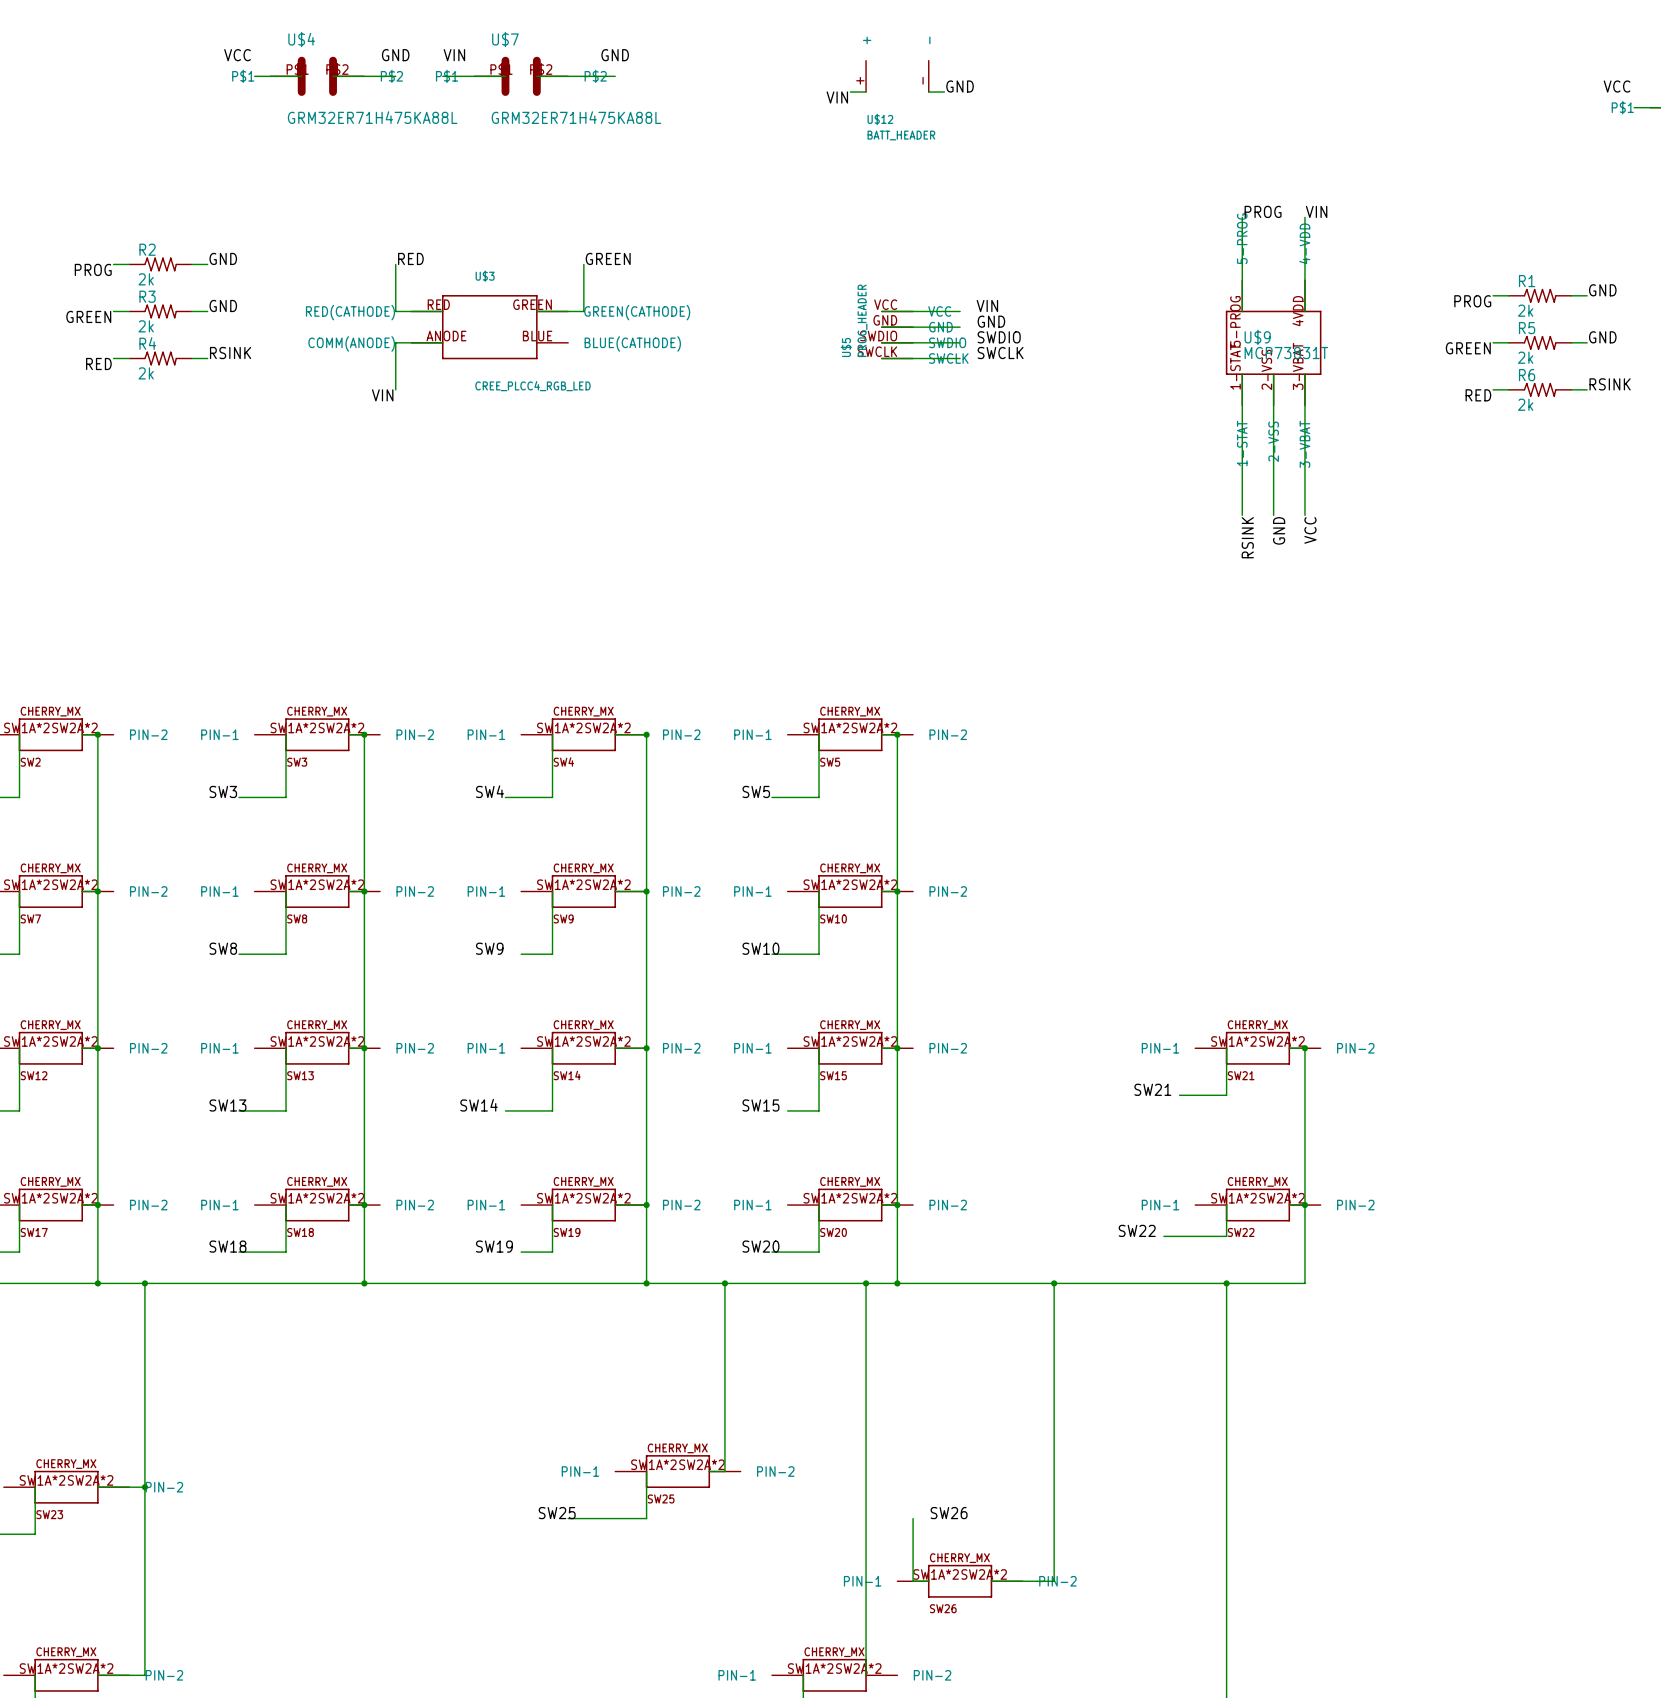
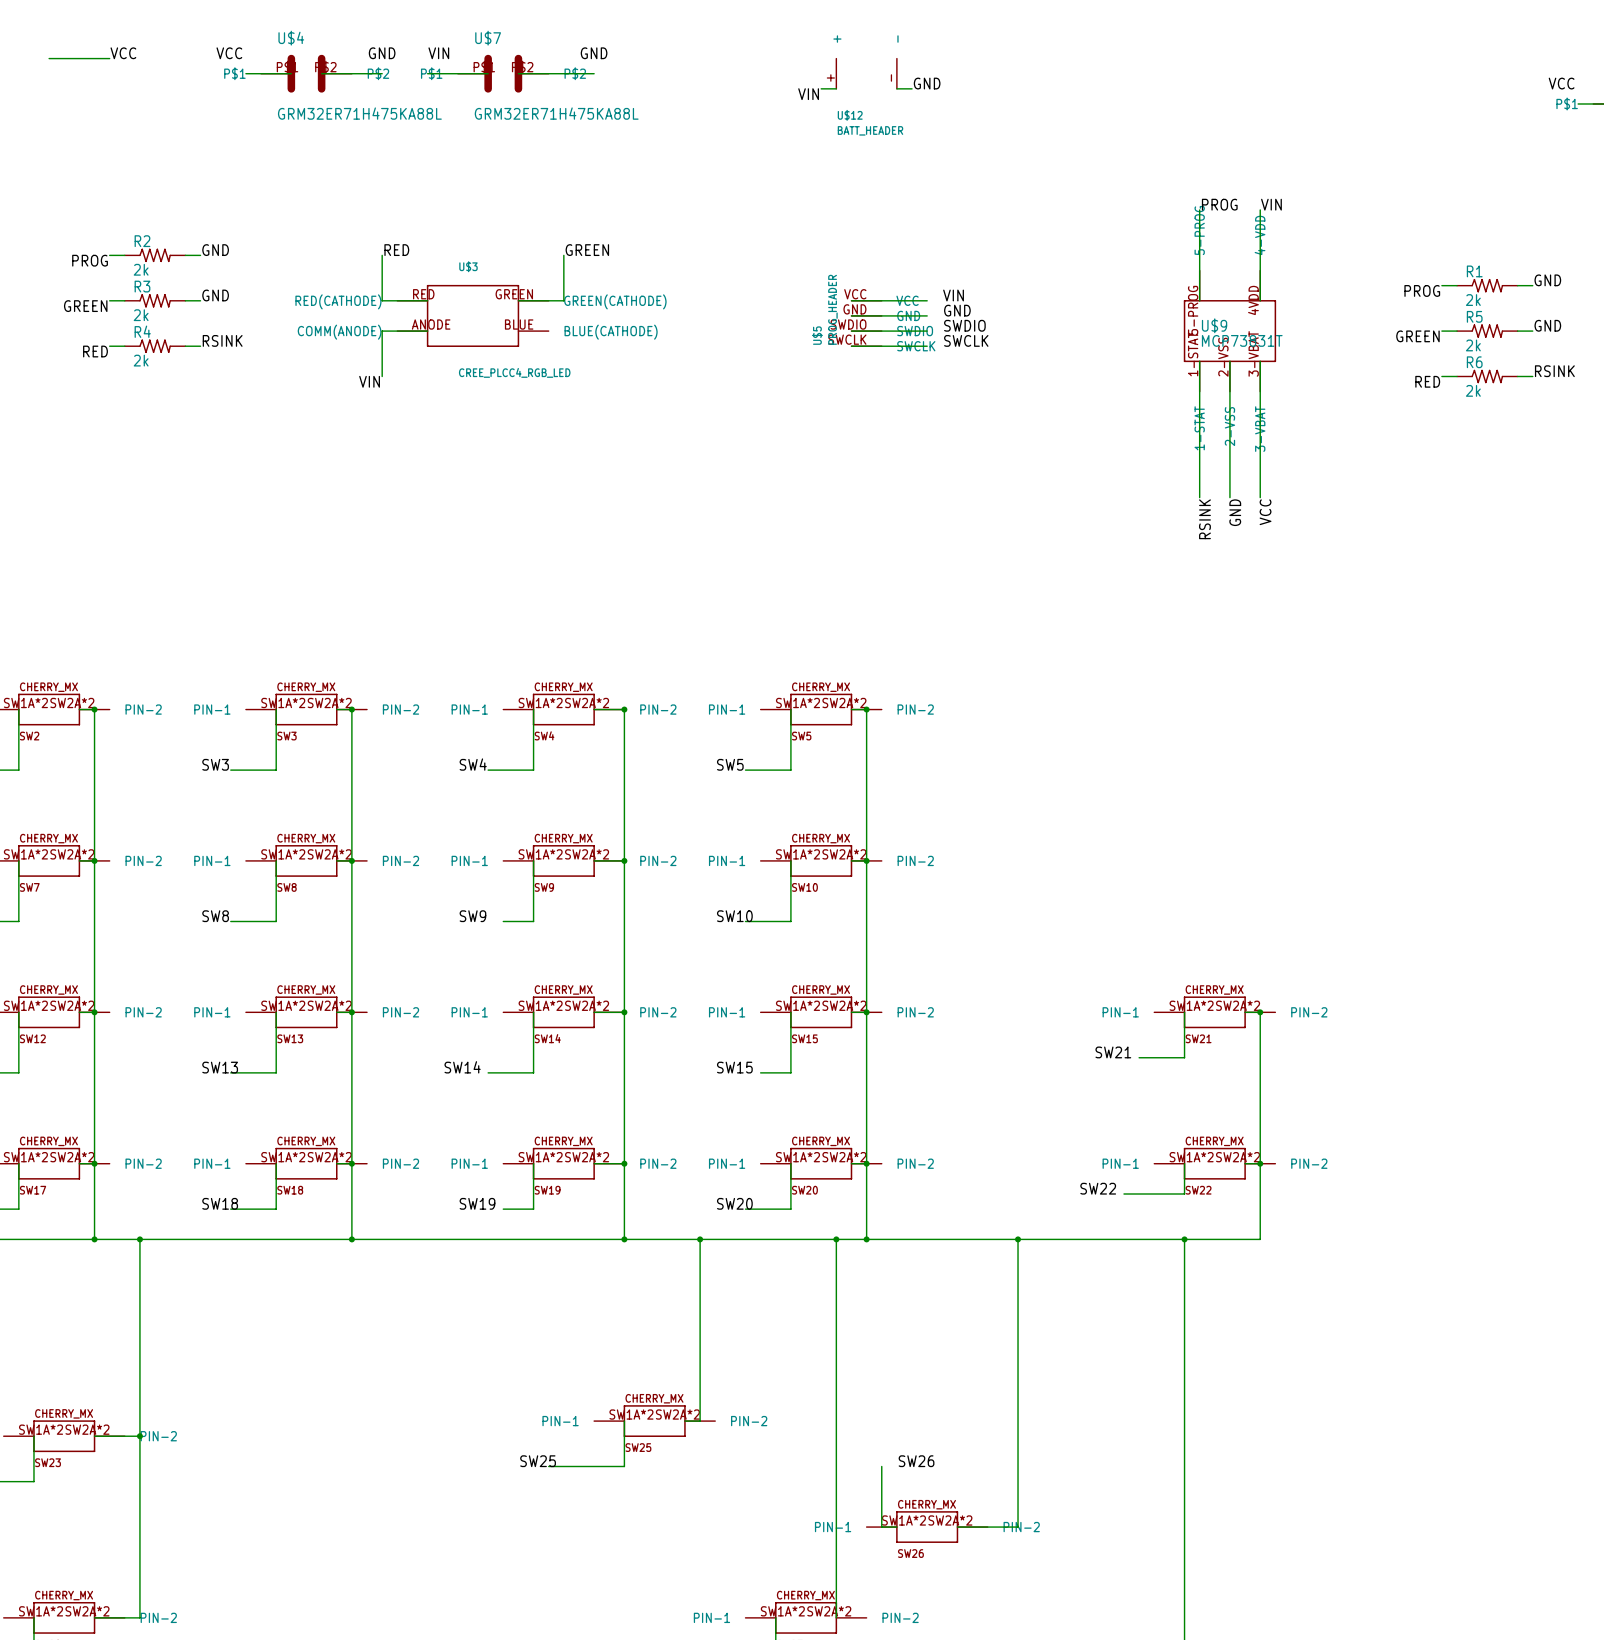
label: none -> VCC (123, 53)
wire: none -> (49, 58) (109, 58)

